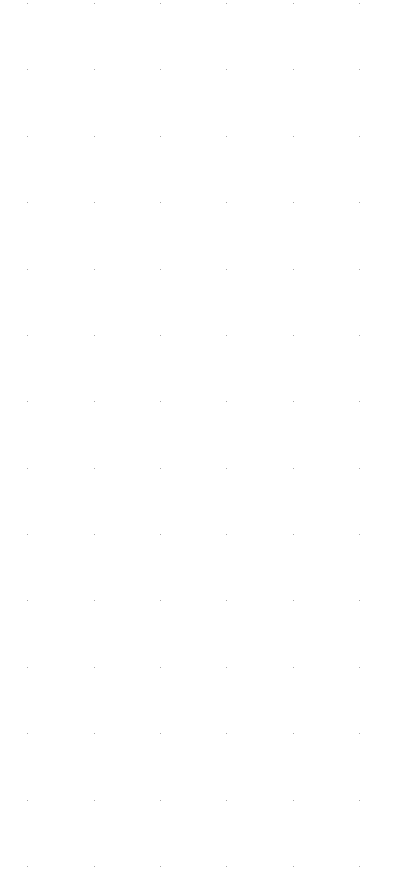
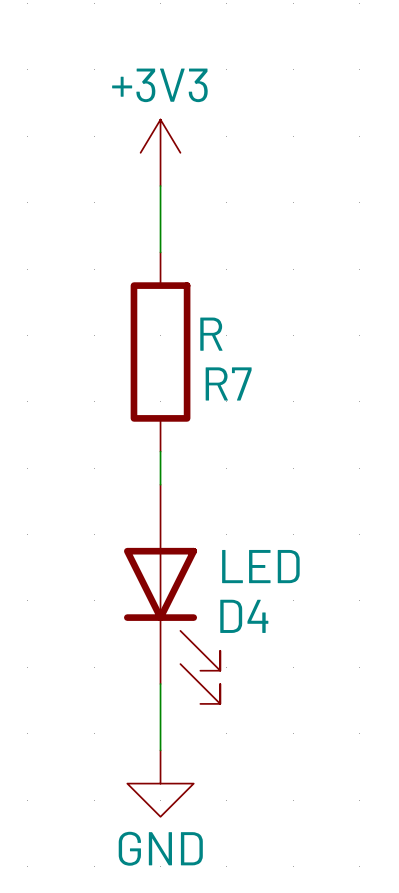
power symbol: none -> +3V3 (160, 152)
wire: none -> (160, 186) (160, 252)
R7: none -> R (160, 352)
wire: none -> (160, 451) (160, 484)
D4: none -> LED (172, 594)
wire: none -> (160, 683) (160, 750)
power symbol: none -> GND (160, 783)

